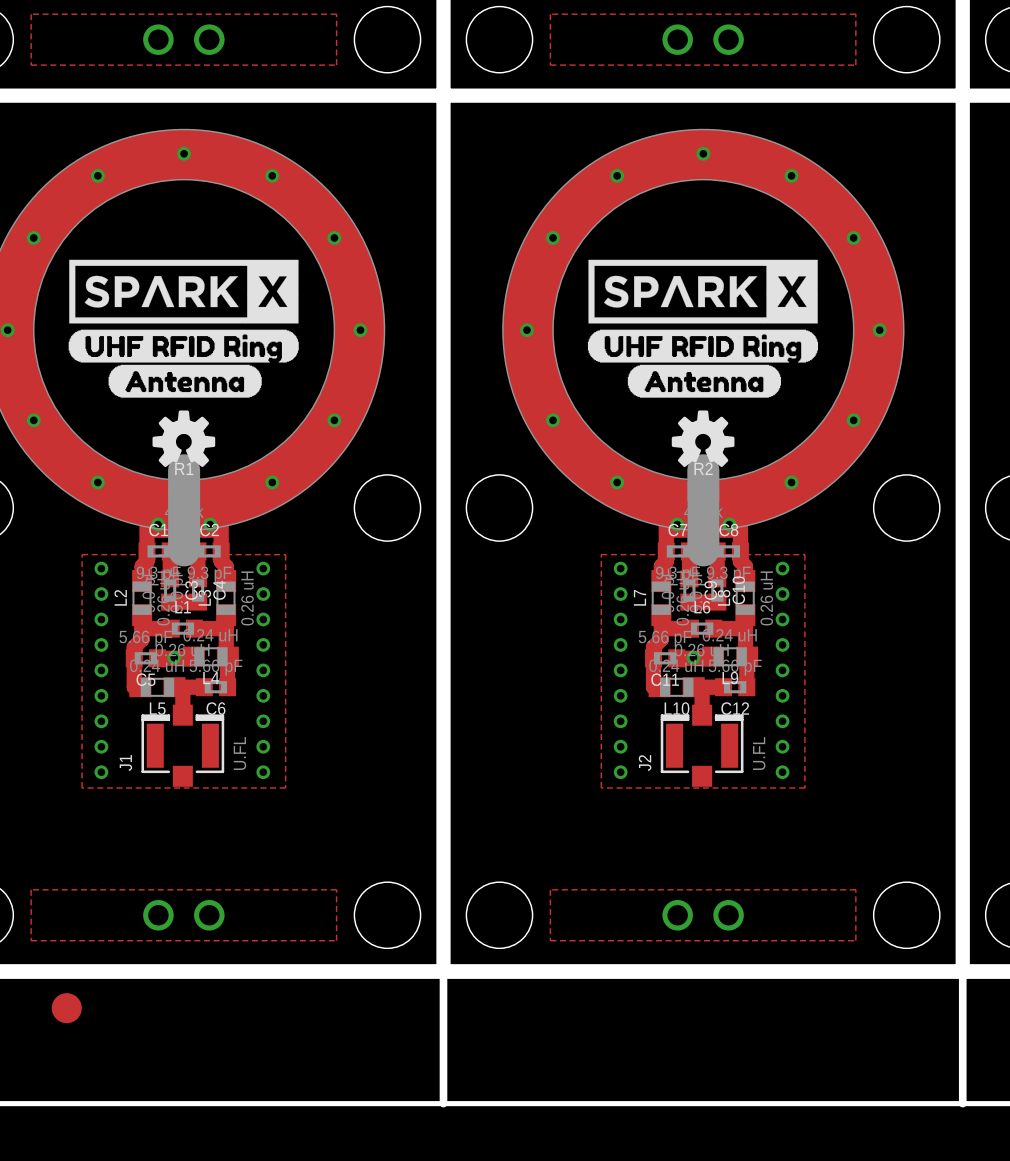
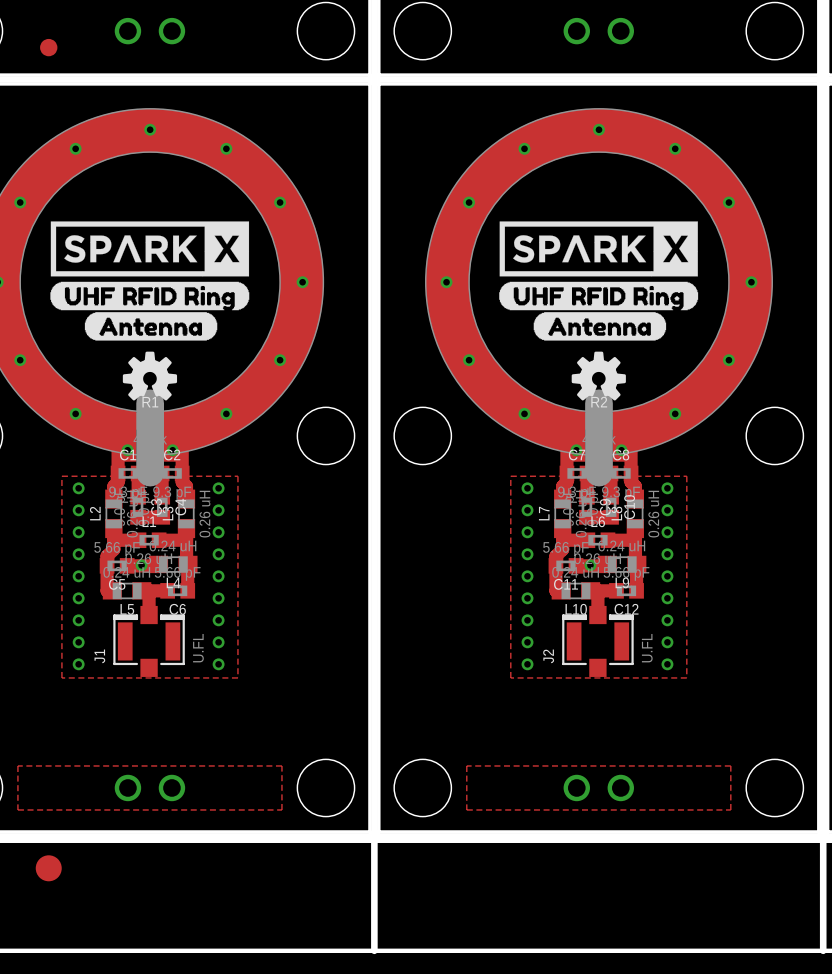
zone outline: (31, 14) (31, 65) (336, 65) (336, 14) (31, 14) -> none
zone outline: (550, 14) (855, 14) (855, 65) (550, 65) (550, 14) -> none
part: none -> (48, 47)

